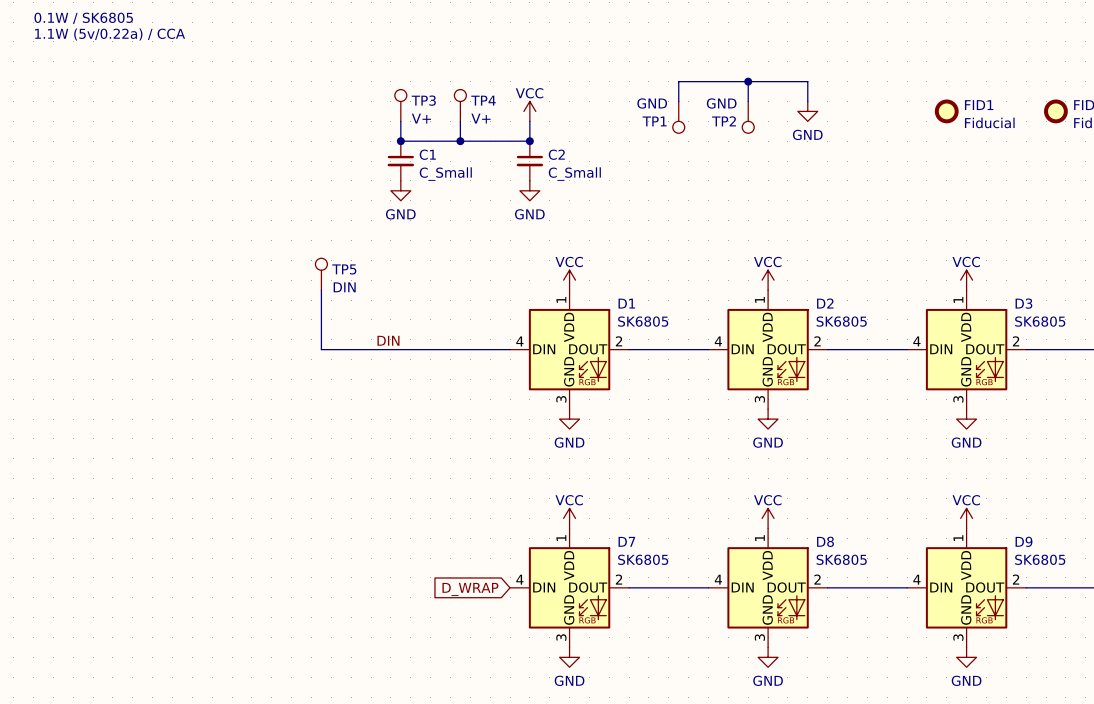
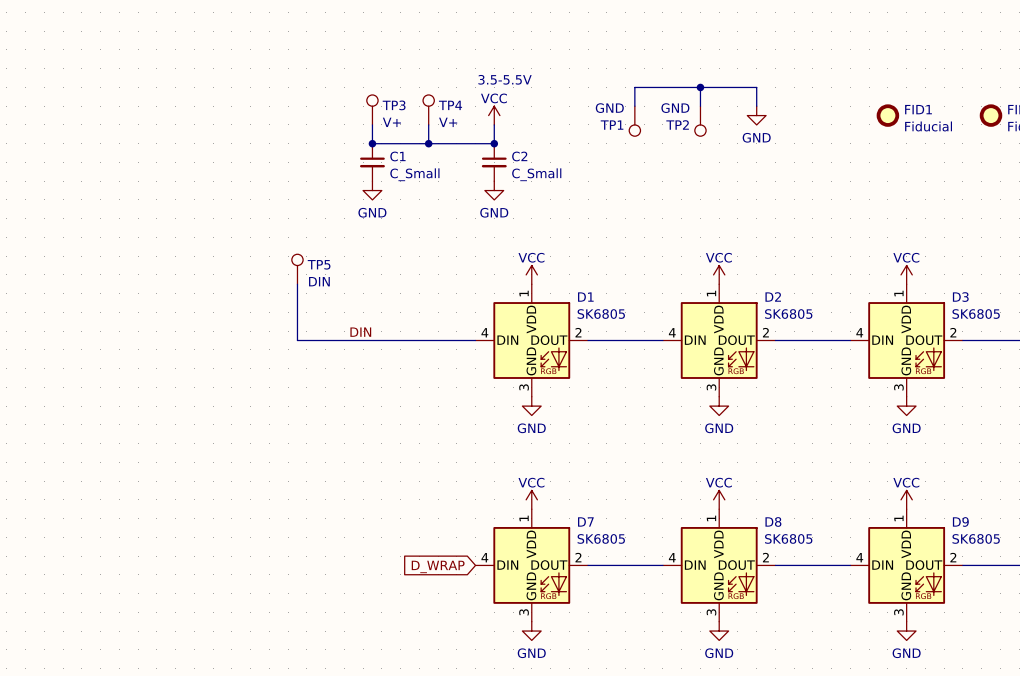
text: 0.1W / SK6805 (83, 18) -> none
text: 1.1W (5v/0.22a) / CCA (110, 34) -> none
text: none -> 3.5-5.5V (505, 79)

